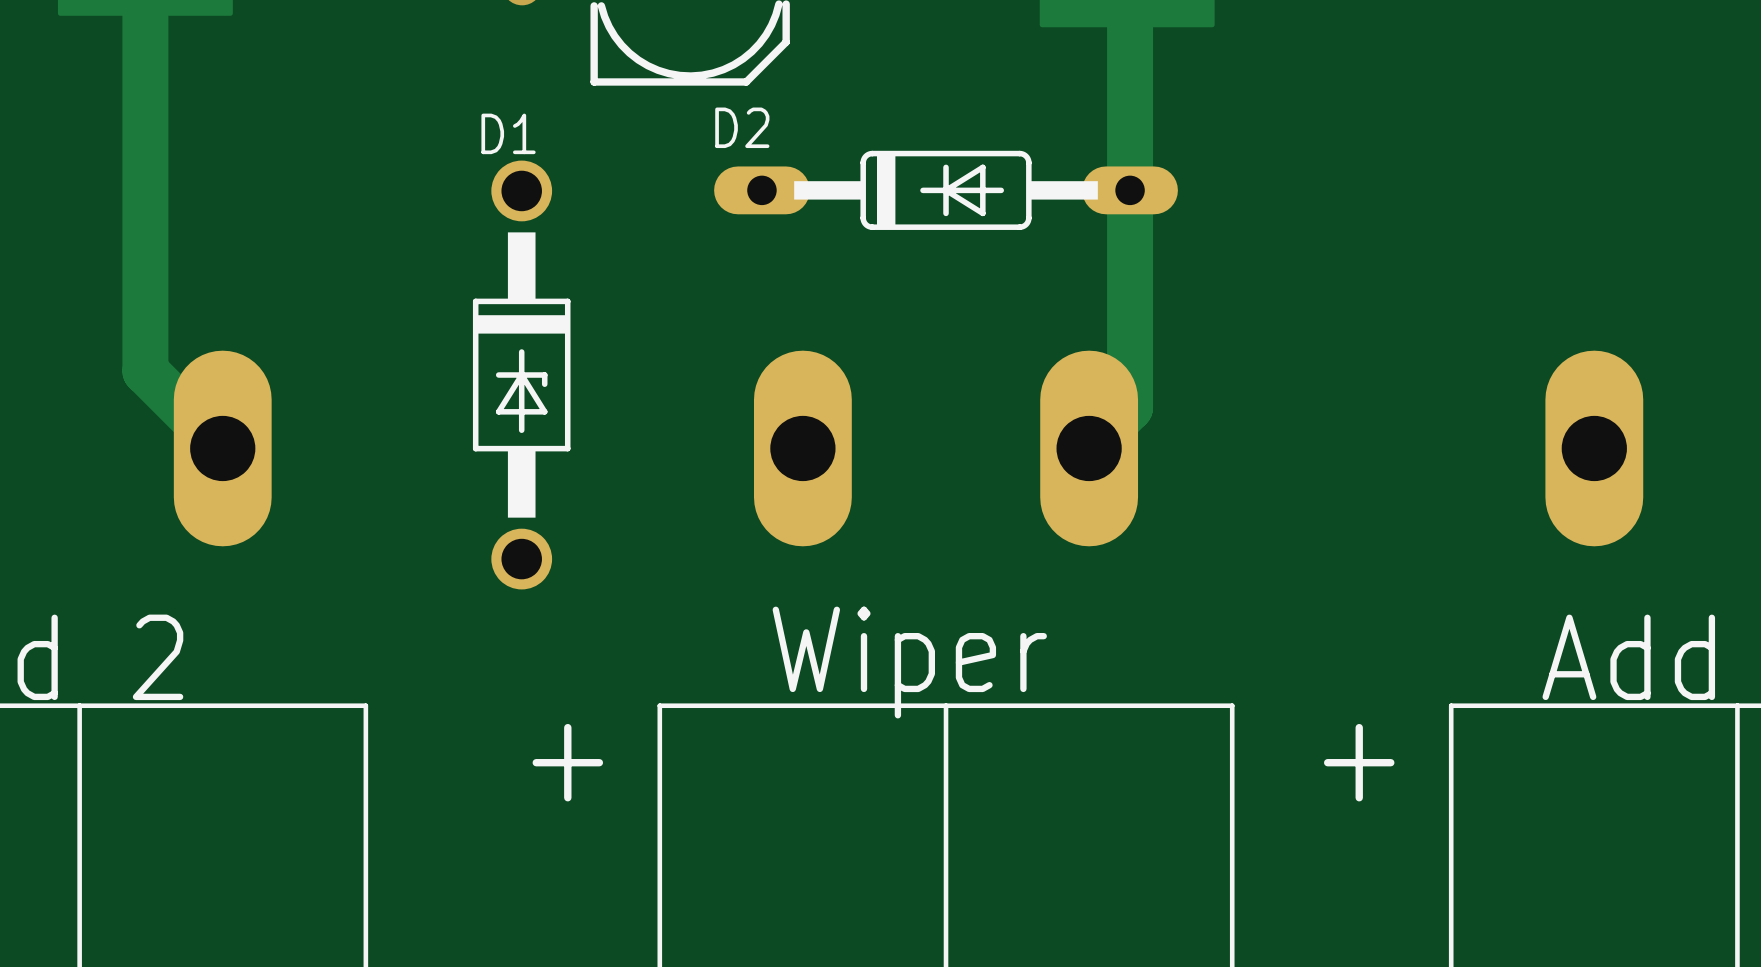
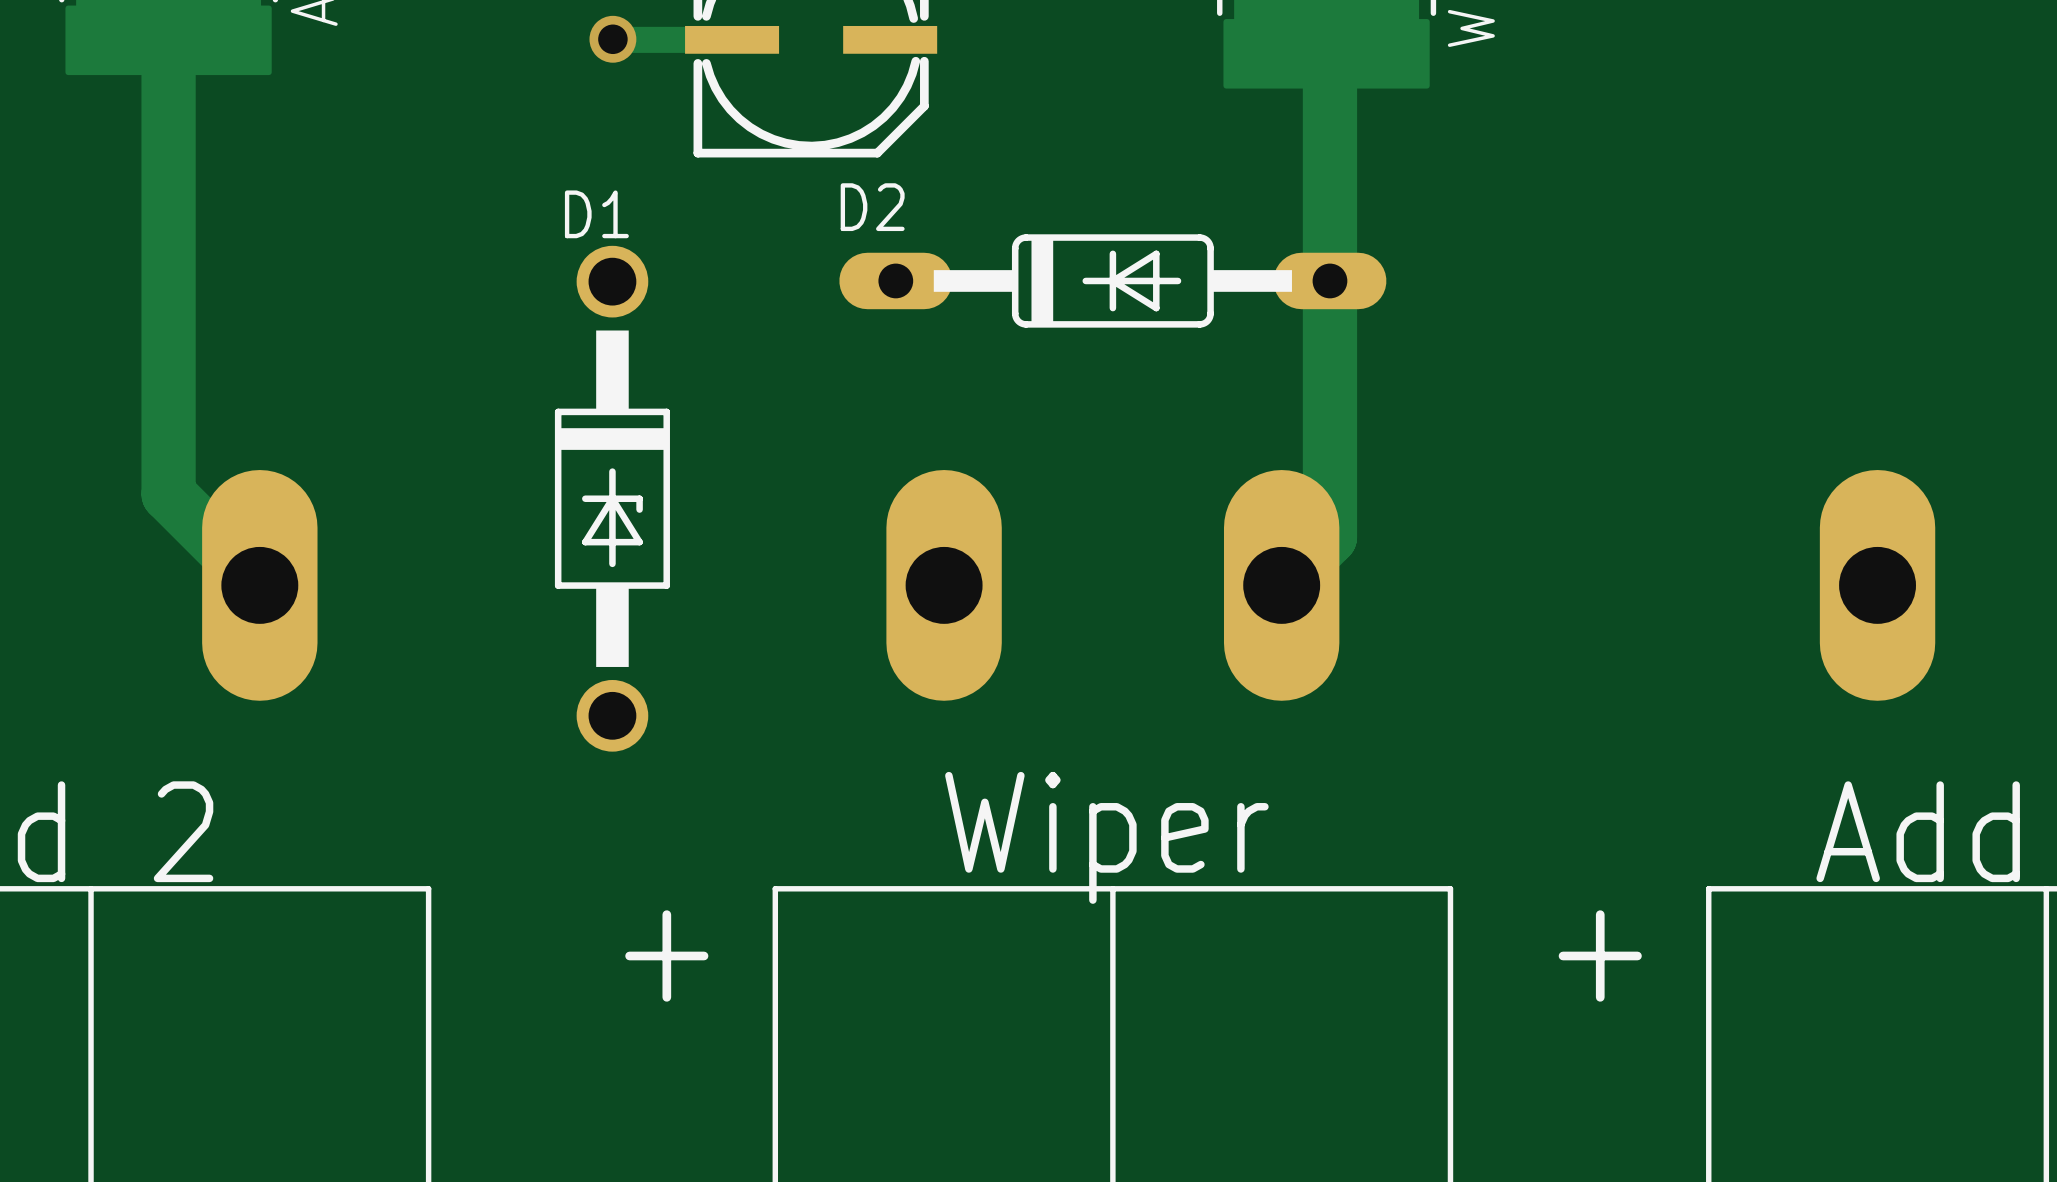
text position: Wiper (909, 662) -> Wiper (1106, 837)

